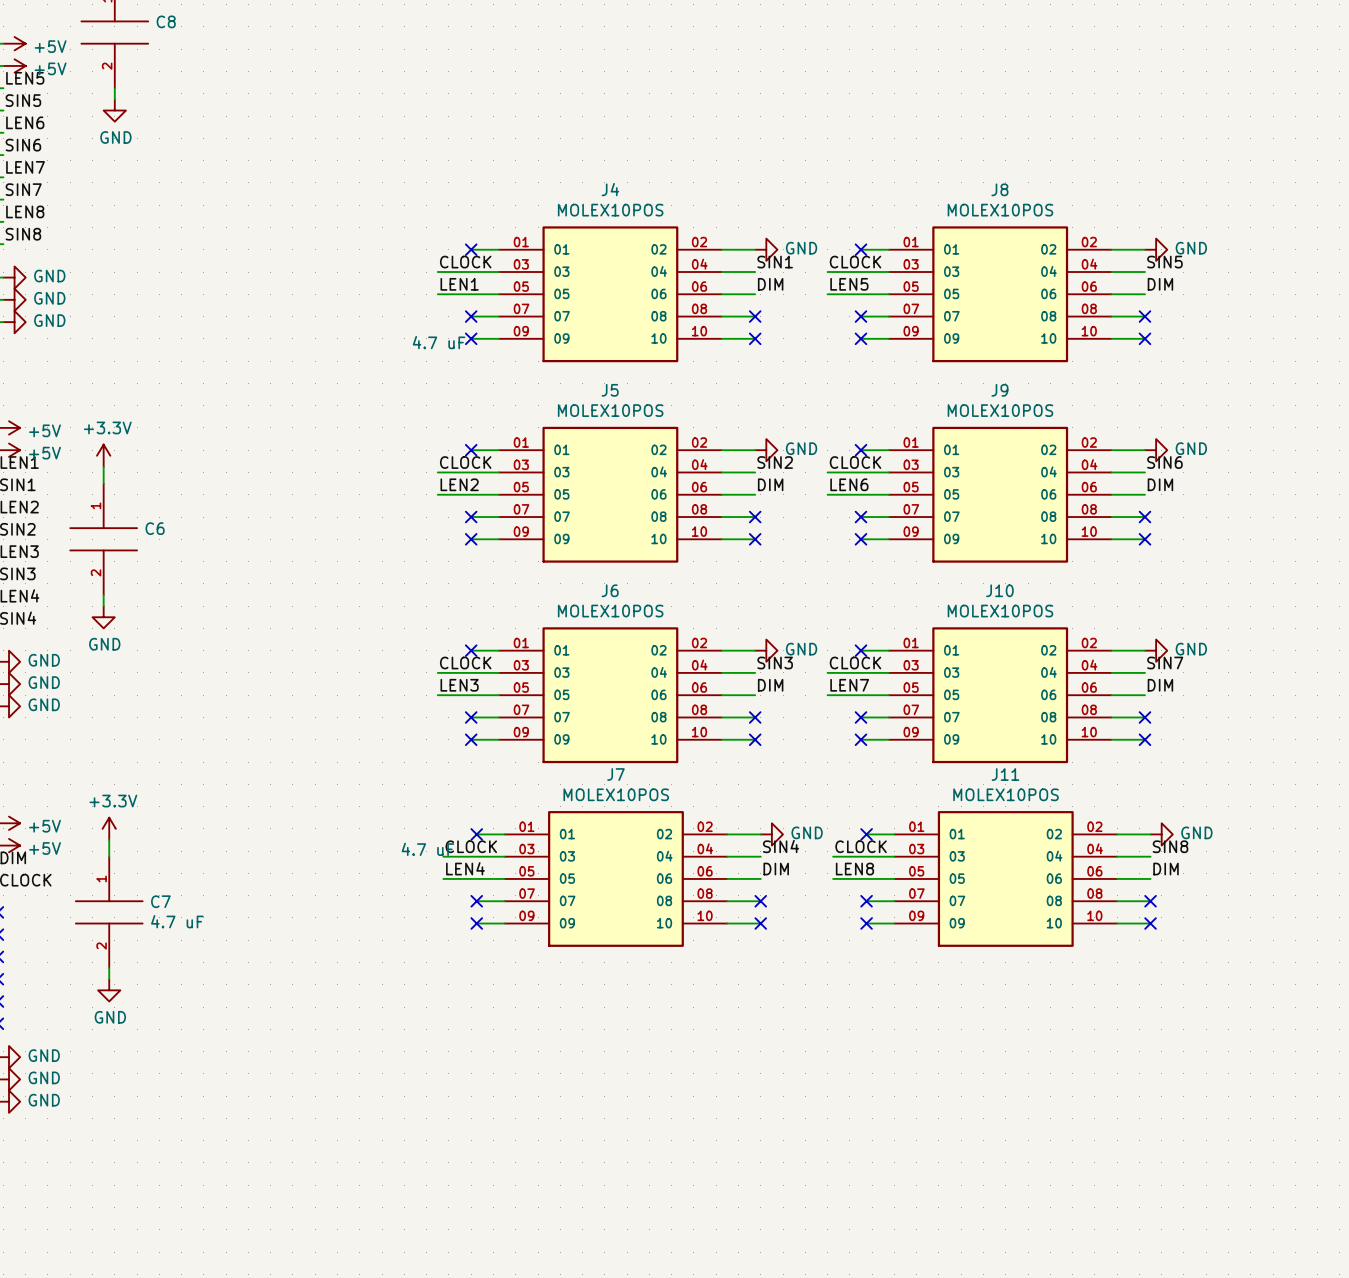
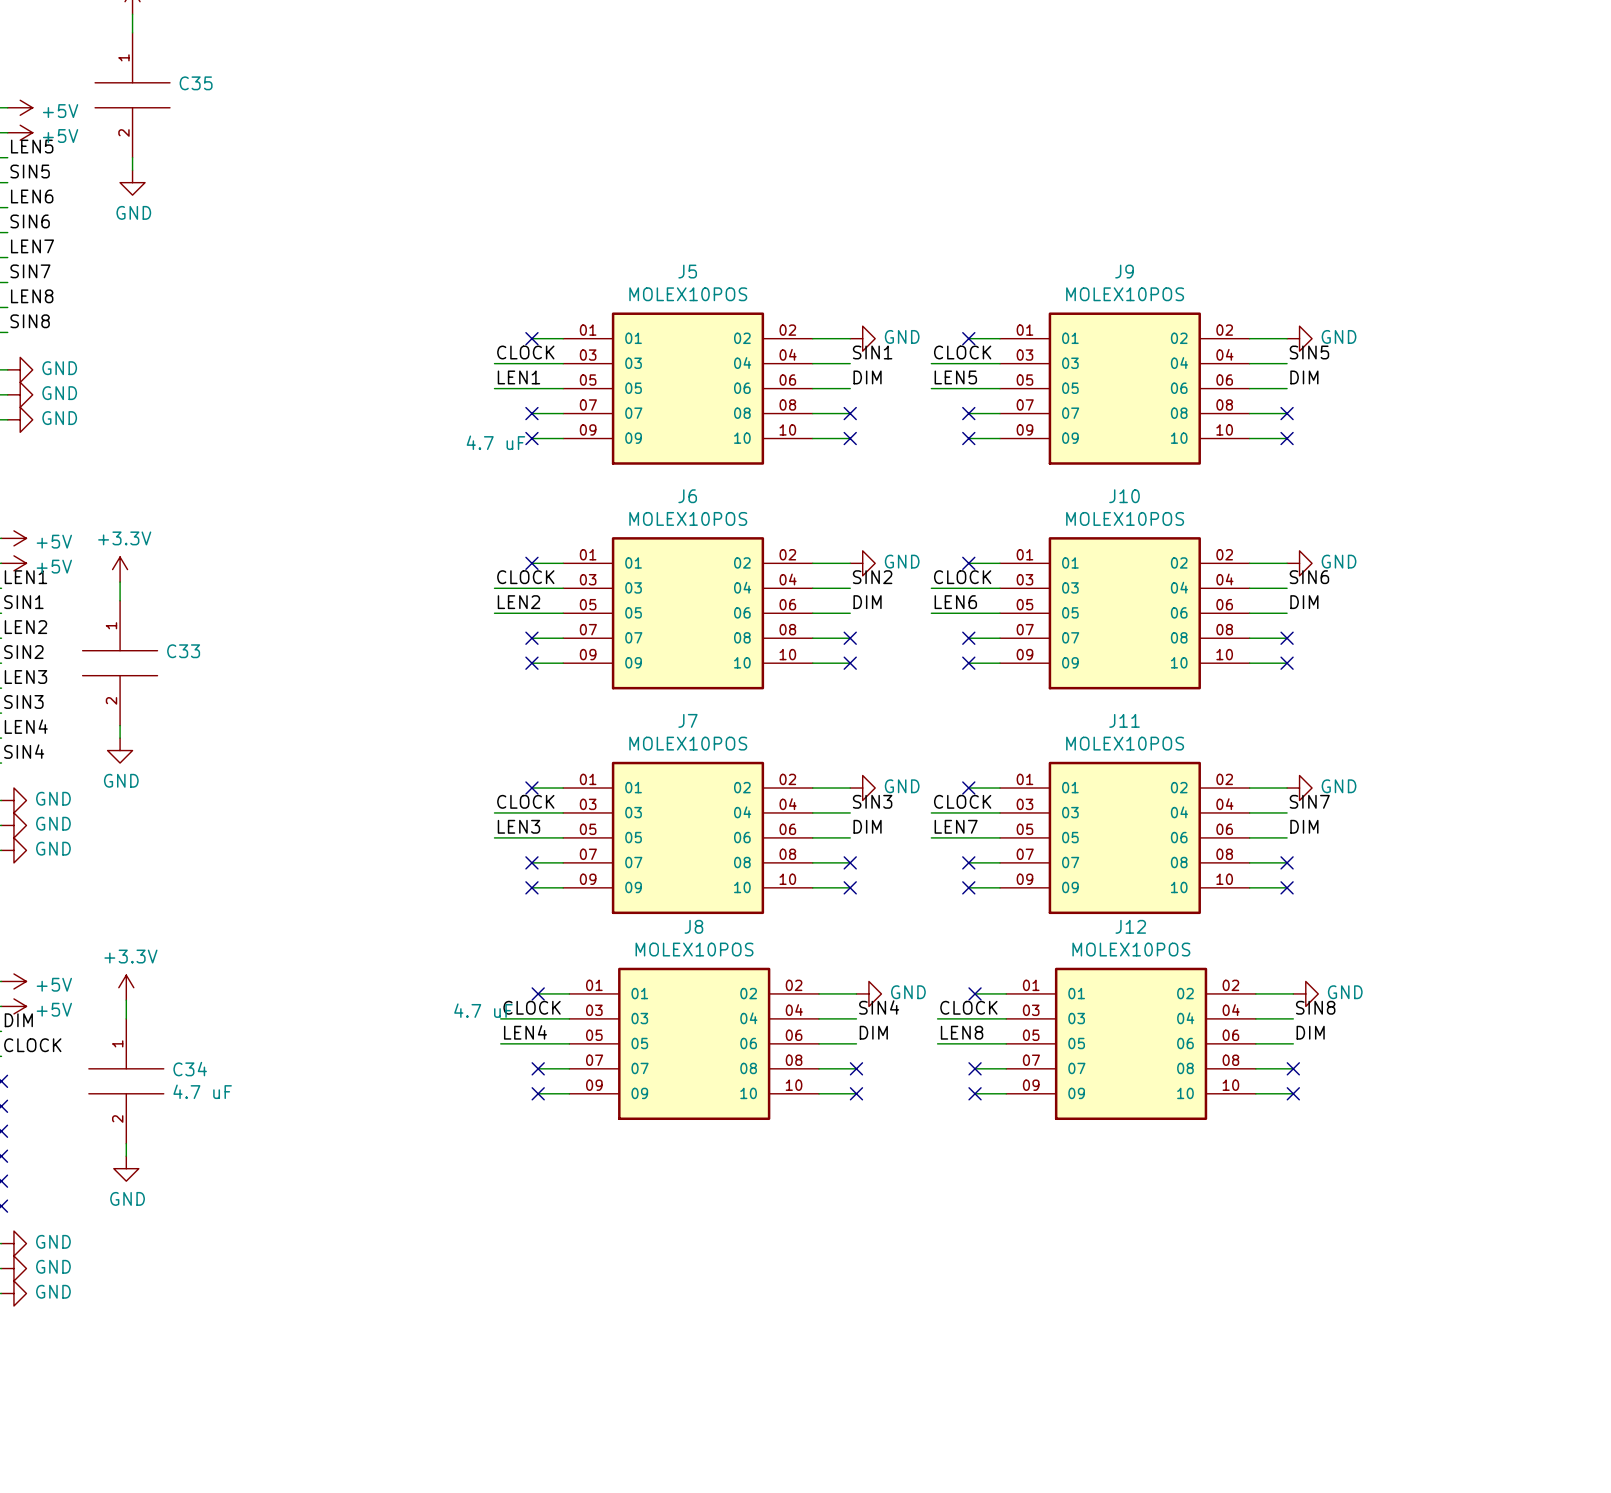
C8 name: C8 (166, 21) -> C35 (196, 83)
J4 name: J4 (610, 189) -> J5 (687, 271)
J8 name: J8 (999, 189) -> J9 (1124, 271)
J5 name: J5 (610, 390) -> J6 (687, 496)
J9 name: J9 (999, 390) -> J10 (1124, 496)
C6 name: C6 (155, 528) -> C33 (183, 651)
J6 name: J6 (610, 590) -> J7 (687, 720)
J10 name: J10 (999, 590) -> J11 (1124, 720)
J7 name: J7 (615, 774) -> J8 (693, 926)
J11 name: J11 (1005, 774) -> J12 (1130, 926)
C7 name: C7 (160, 901) -> C34 (190, 1069)

